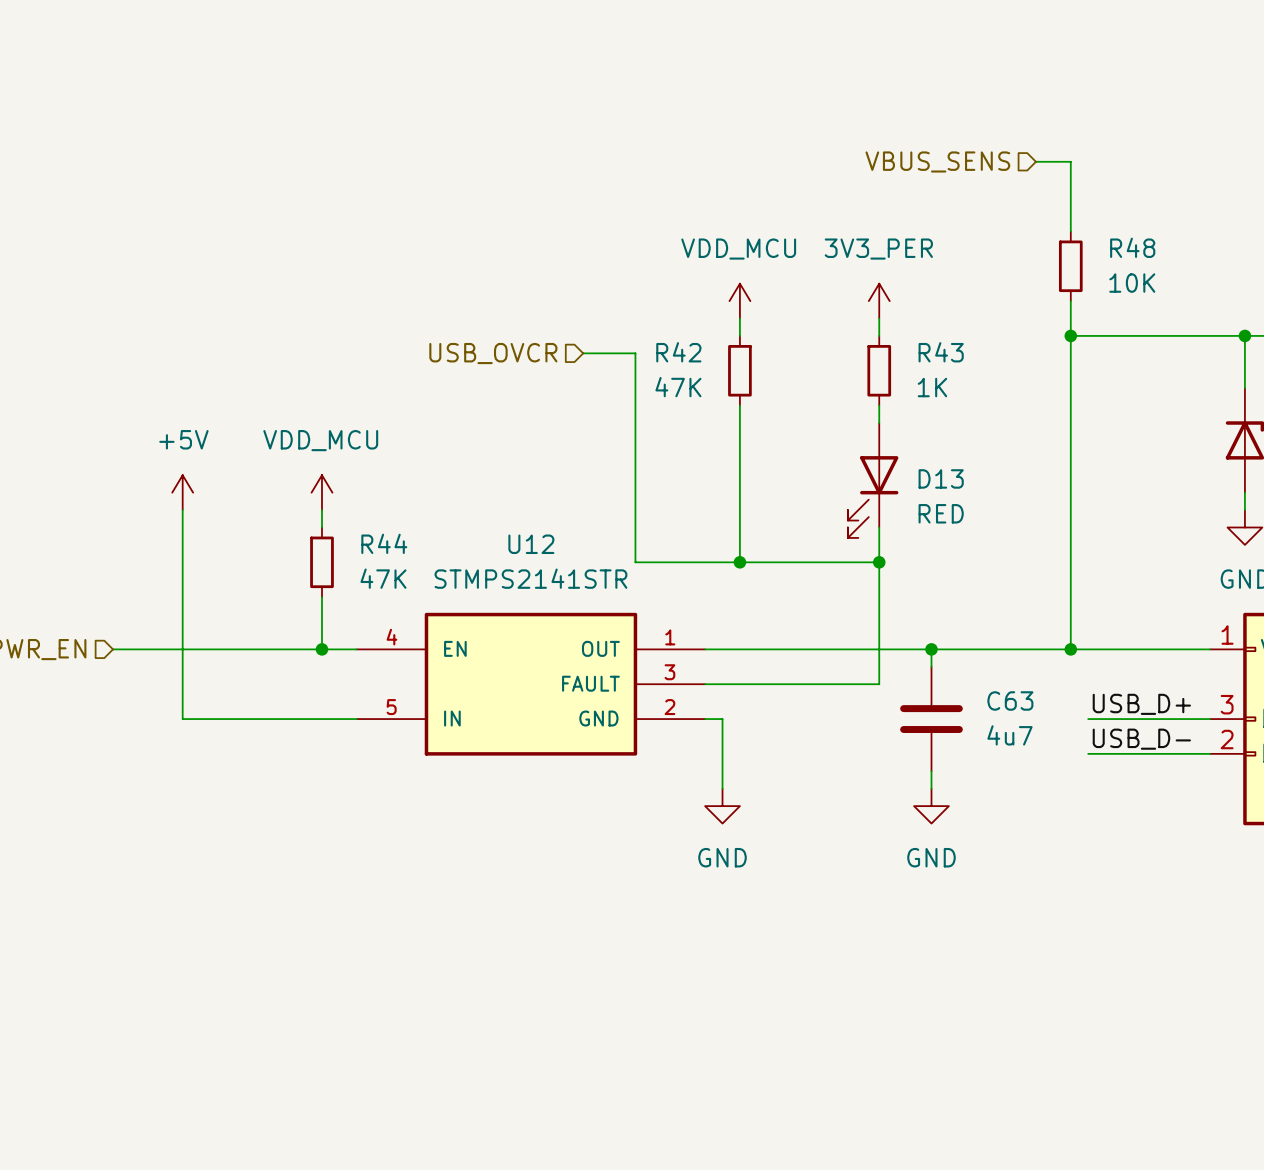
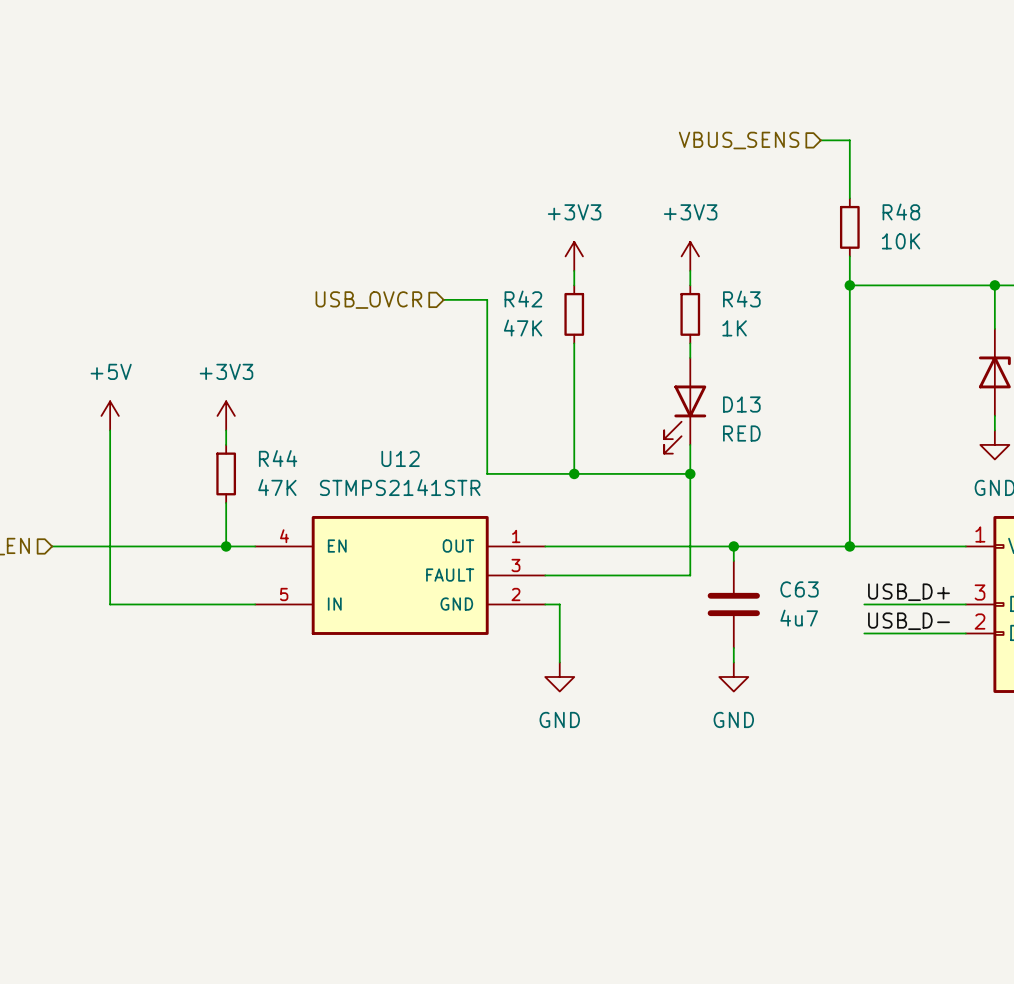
power symbol: VDD_MCU (739, 301) -> +3V3 (574, 256)
power symbol: 3V3_PER (879, 301) -> +3V3 (690, 256)
power symbol: VDD_MCU (321, 492) -> +3V3 (226, 415)

